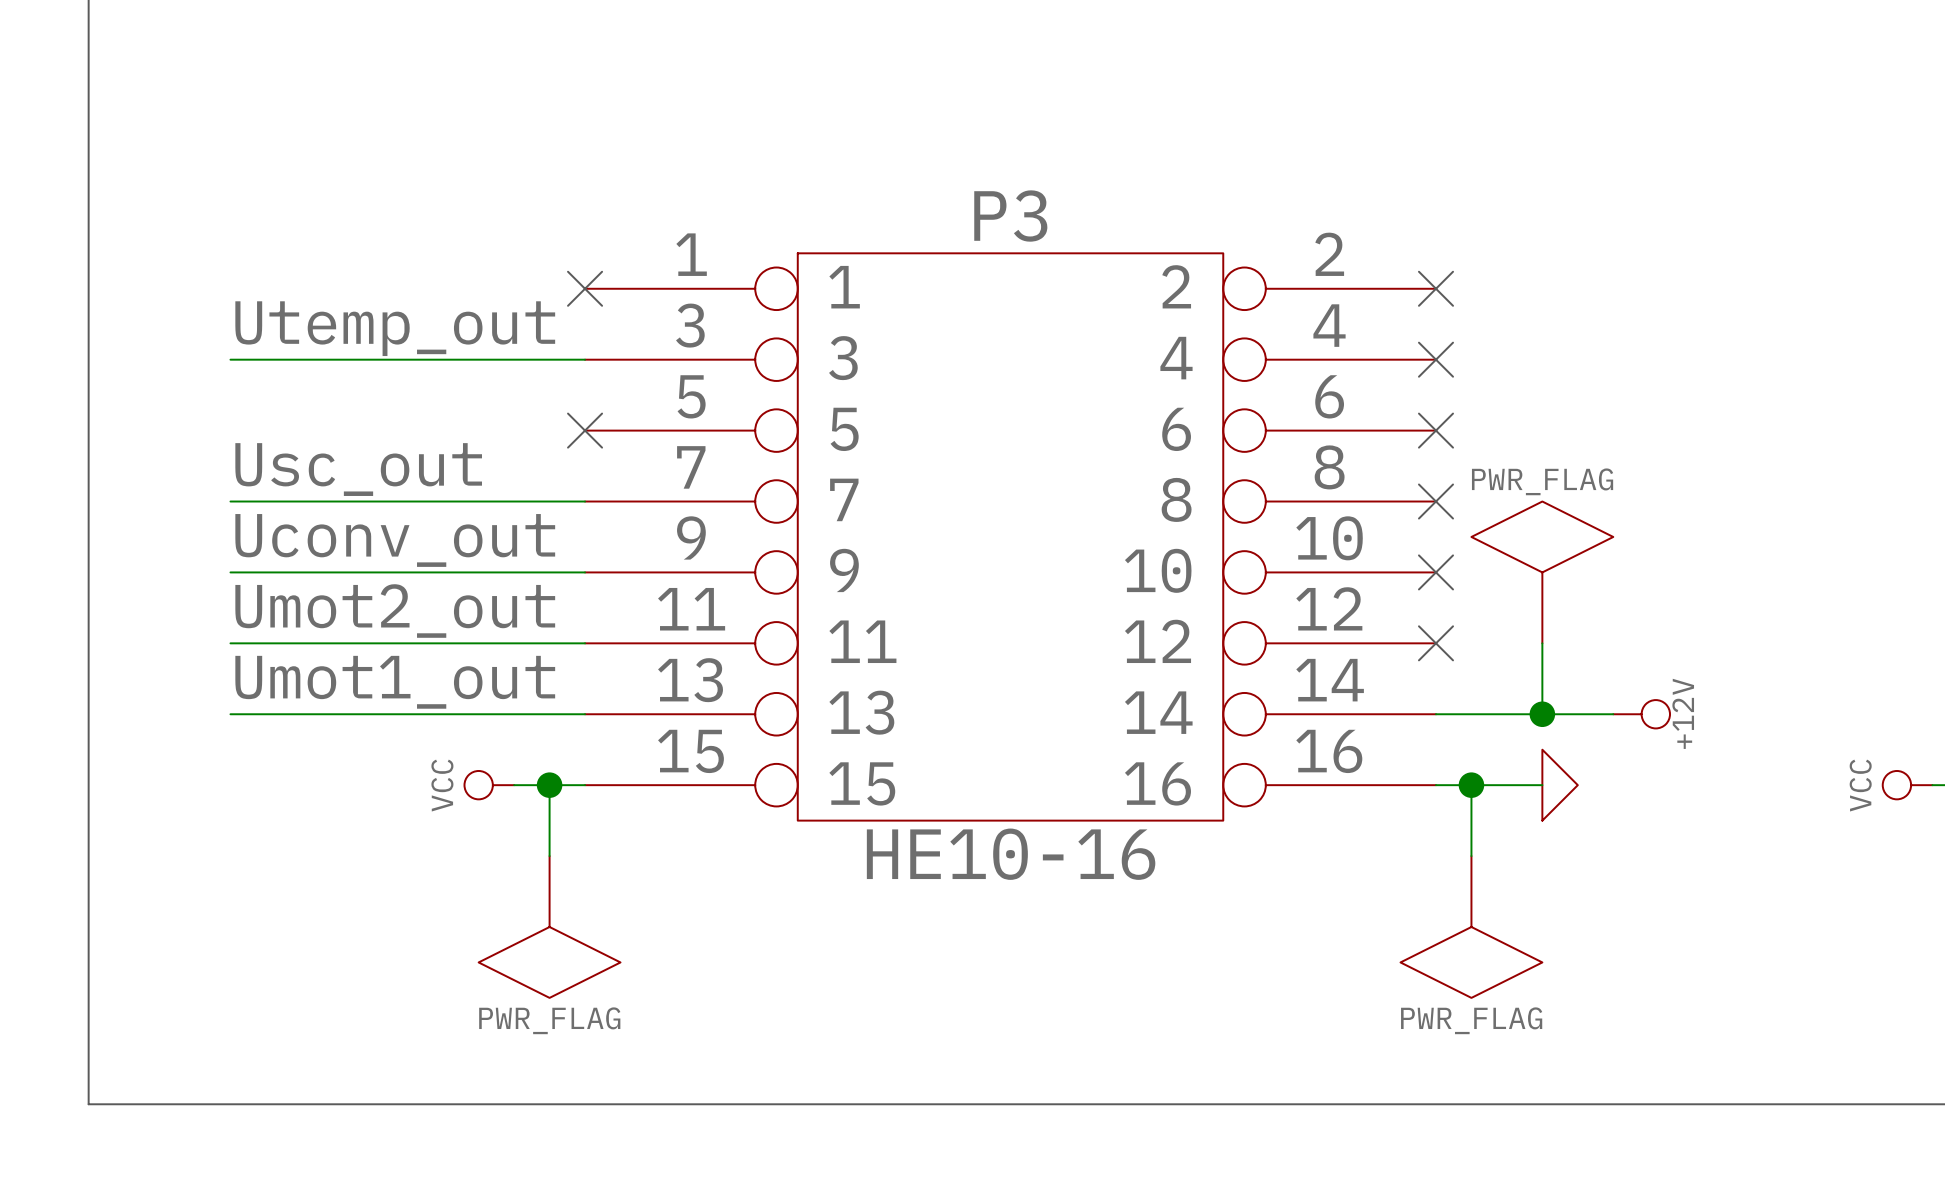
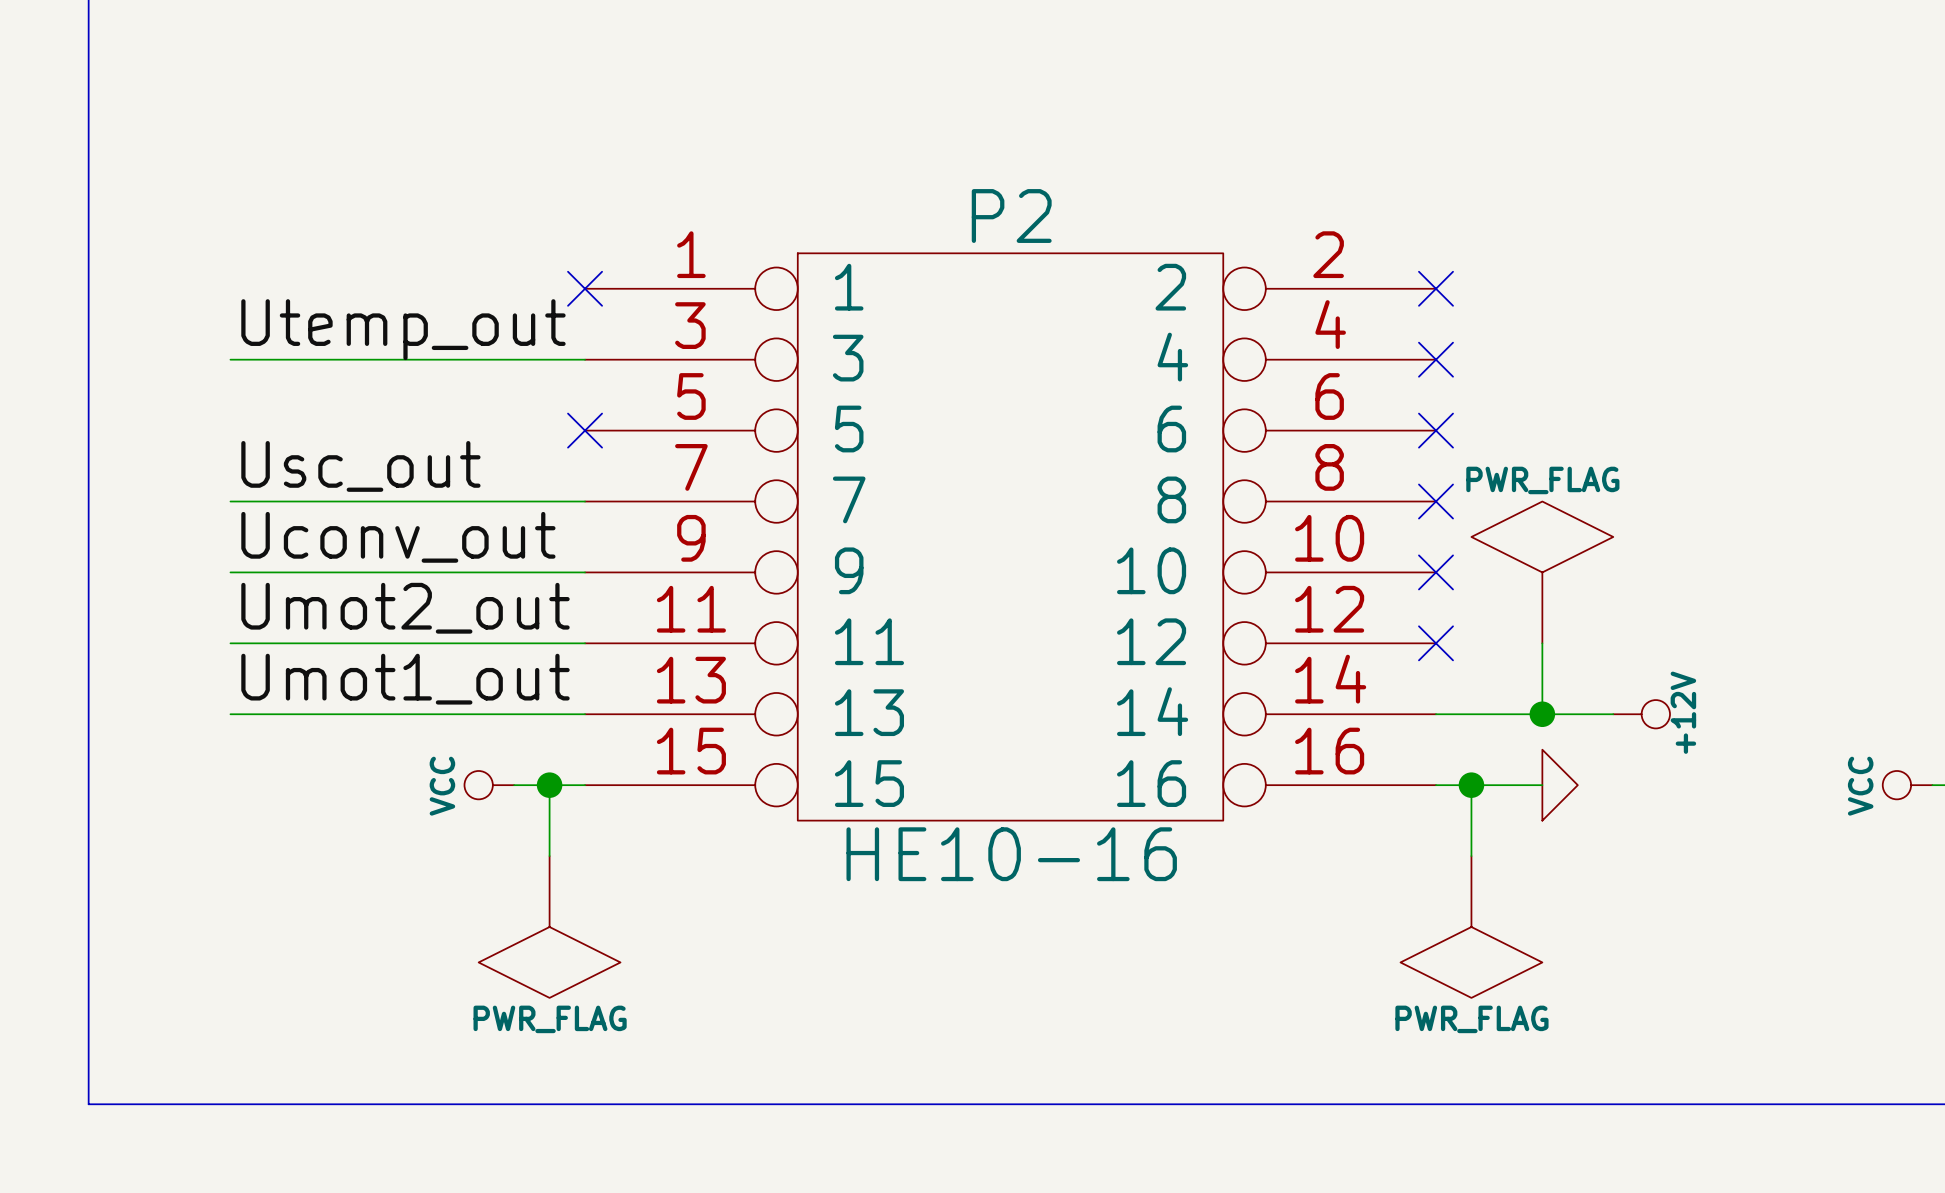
P3 name: P3 (1010, 216) -> P2 (1011, 216)

